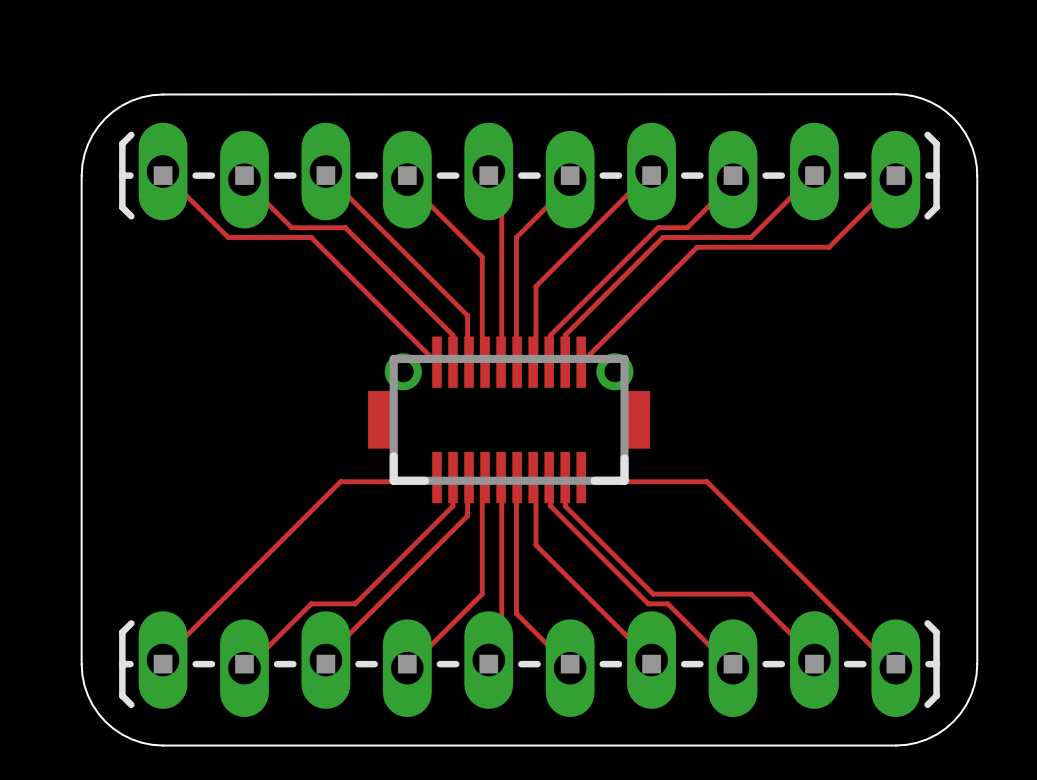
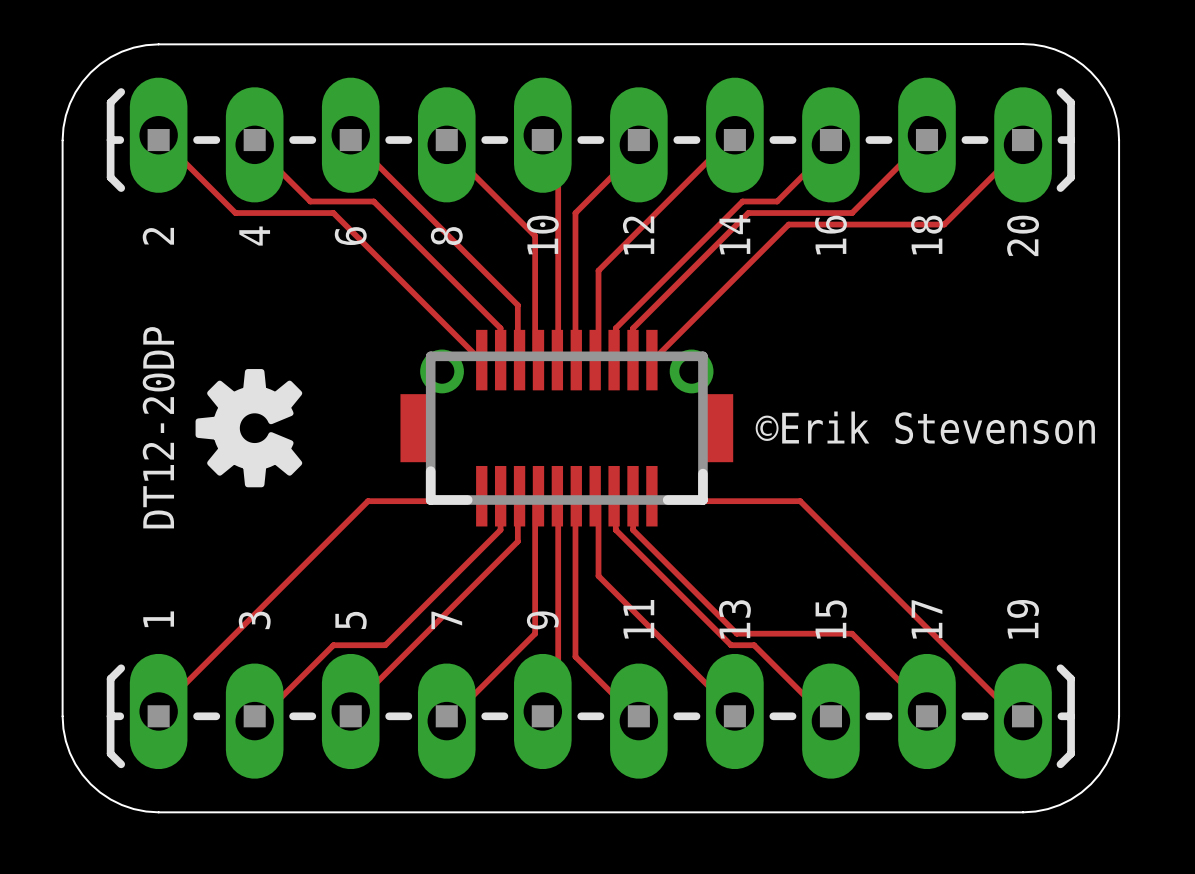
text: none -> 14 (734, 234)
text: none -> 4 (254, 236)
text: none -> 10 (542, 235)
text: none -> 12 (638, 235)
text: none -> 16 (830, 235)
text: none -> 18 (927, 235)
text: none -> 20 (1023, 235)
text: none -> 2 (158, 236)
text: none -> 6 (350, 236)
text: none -> 8 (446, 236)
drawing: none -> [195, 369, 303, 488]
text: none -> DT12-20DP (158, 427)
text: none -> ©Erik Stevenson (925, 427)
text: none -> 1 (158, 619)
text: none -> 11 (638, 619)
text: none -> 13 (734, 619)
text: none -> 17 (926, 619)
text: none -> 19 (1023, 619)
text: none -> 3 (254, 620)
text: none -> 5 (351, 620)
text: none -> 7 (446, 620)
text: none -> 9 (542, 620)
text: none -> 15 (831, 619)

